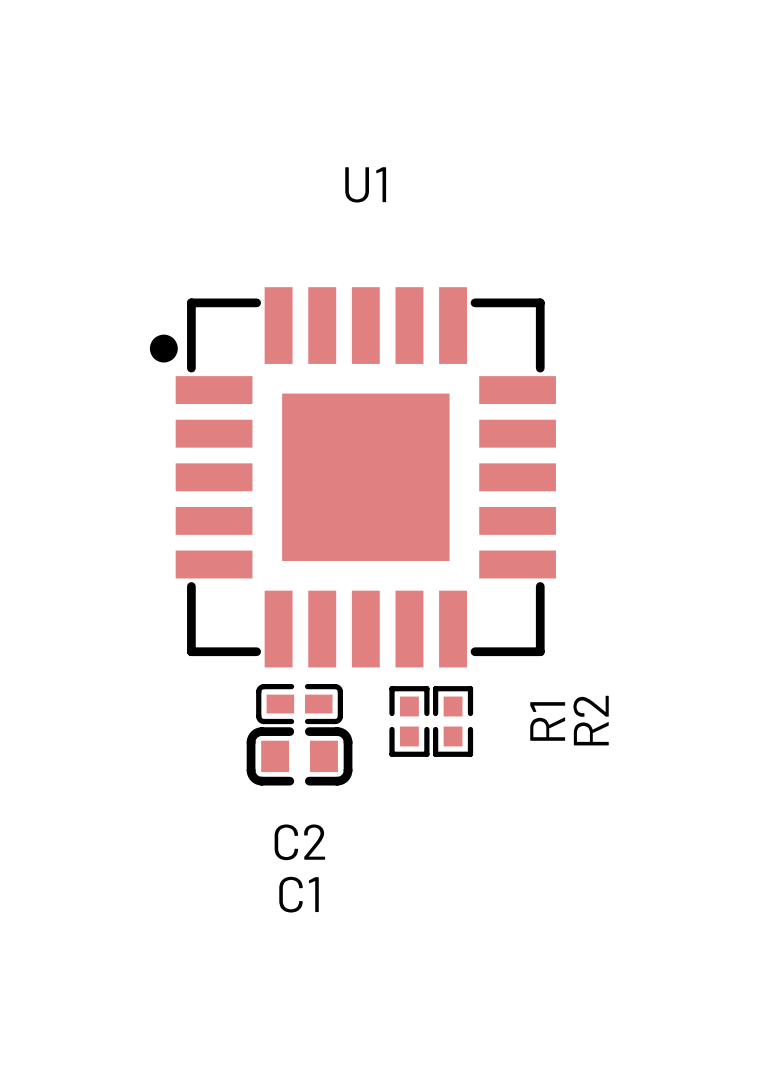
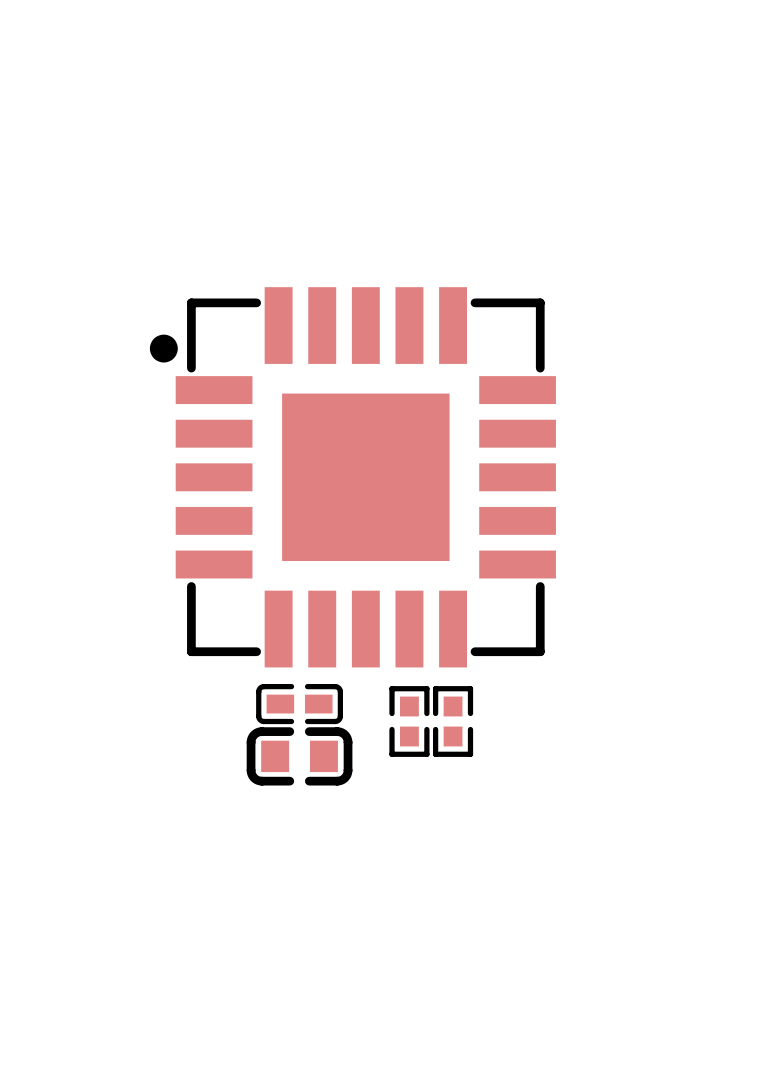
U1 name: U1 (365, 184) -> none
R2 name: R2 (591, 720) -> none
R1 name: R1 (547, 721) -> none
C2 name: C2 (299, 842) -> none
C1 name: C1 (299, 894) -> none

